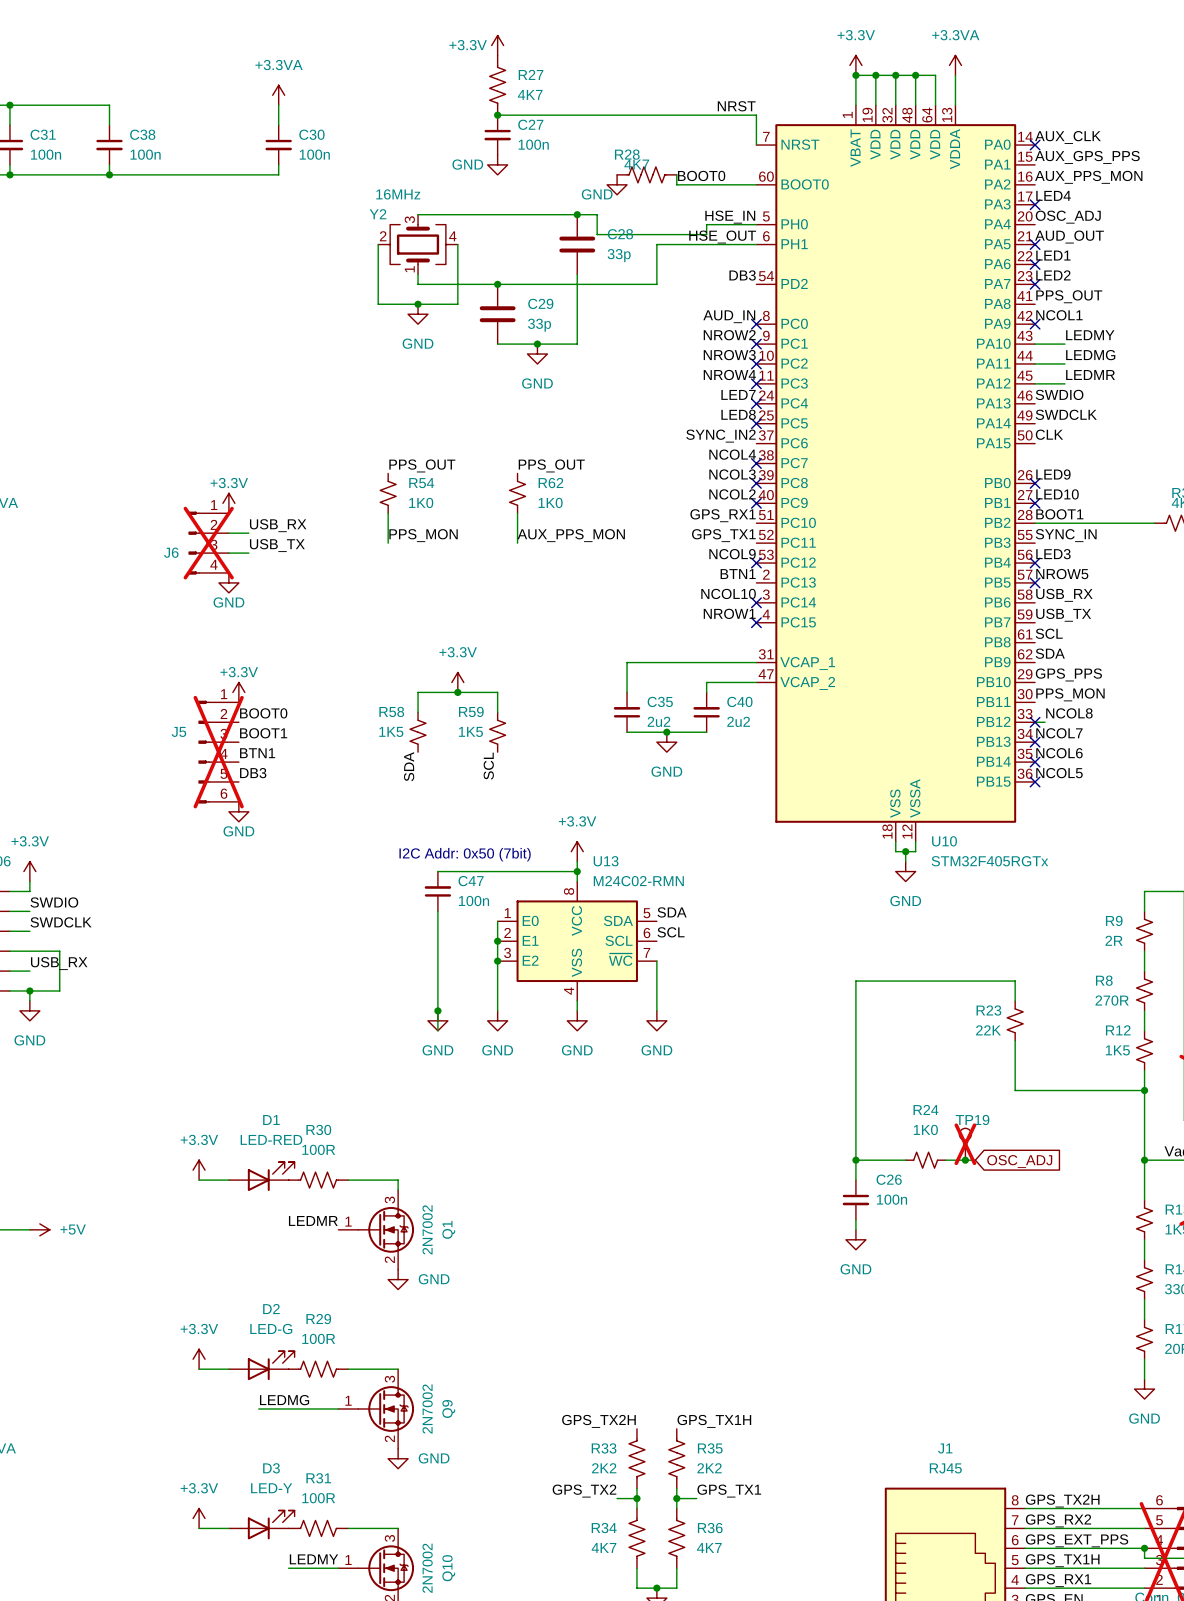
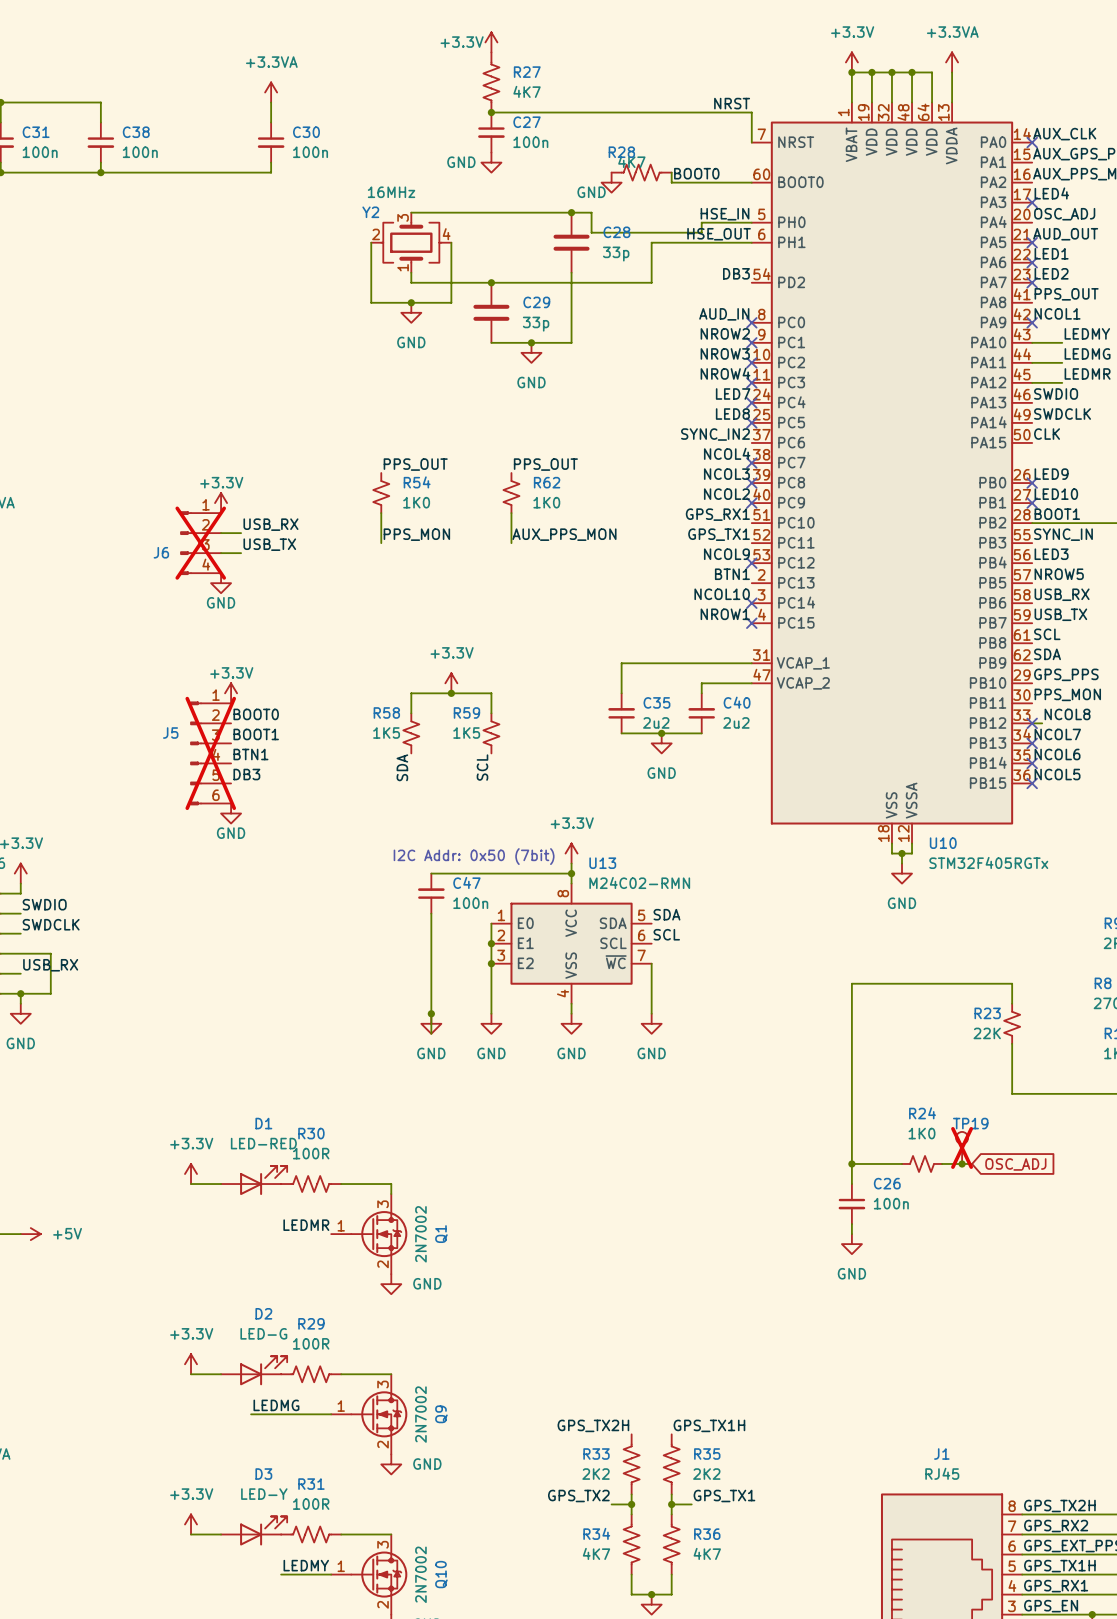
no-connect mark: (1035, 563) -> none
no-connect mark: (1035, 582) -> none

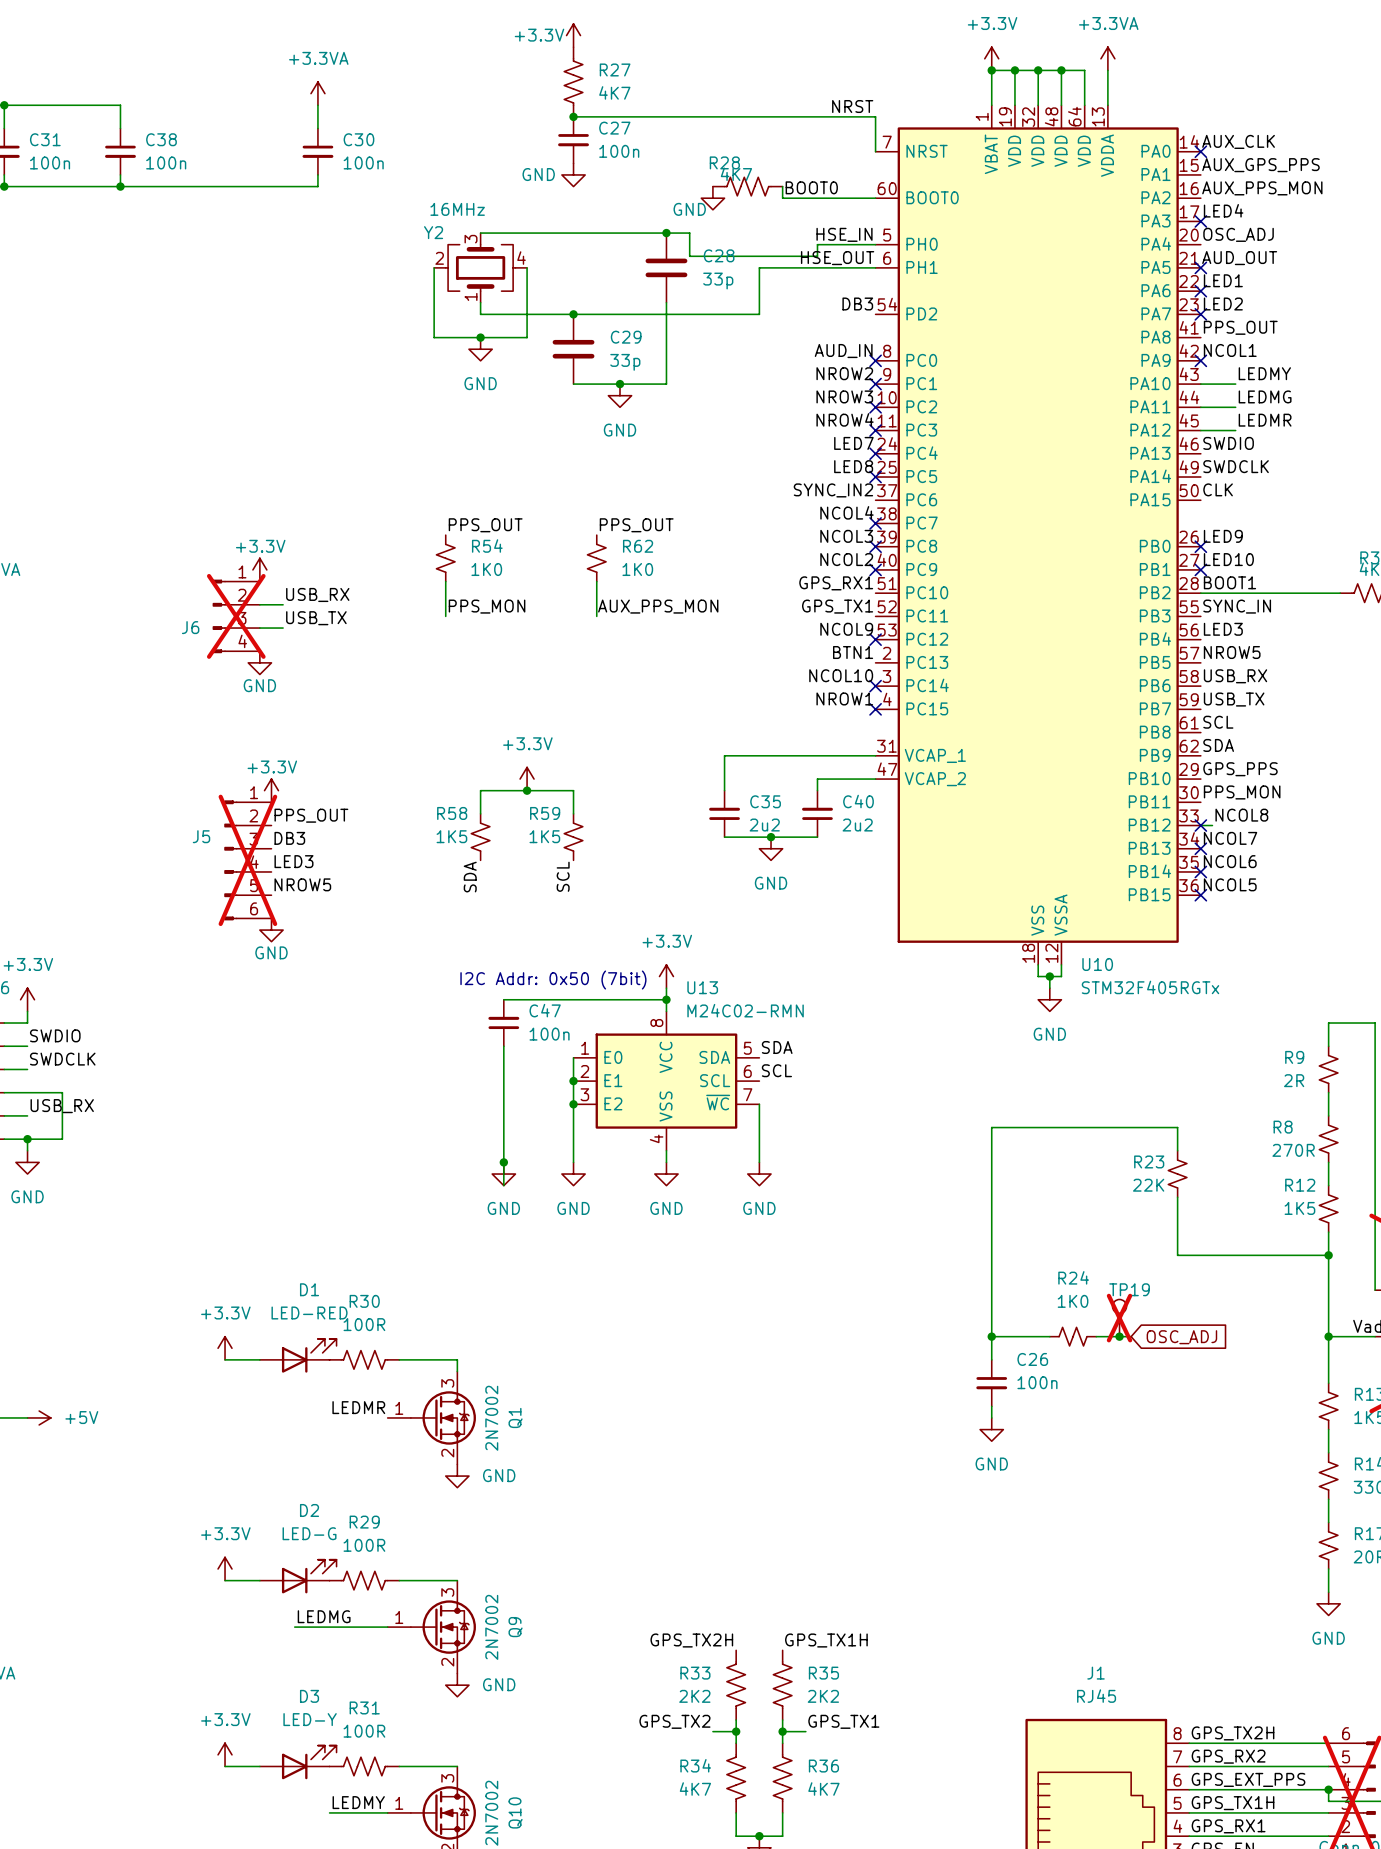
label: BOOT0 (256, 714) -> PPS_OUT (311, 815)
label: BOOT1 (256, 734) -> DB3 (289, 838)
label: BTN1 (250, 754) -> LED3 (293, 861)
label: DB3 (246, 774) -> NROW5 (302, 884)

